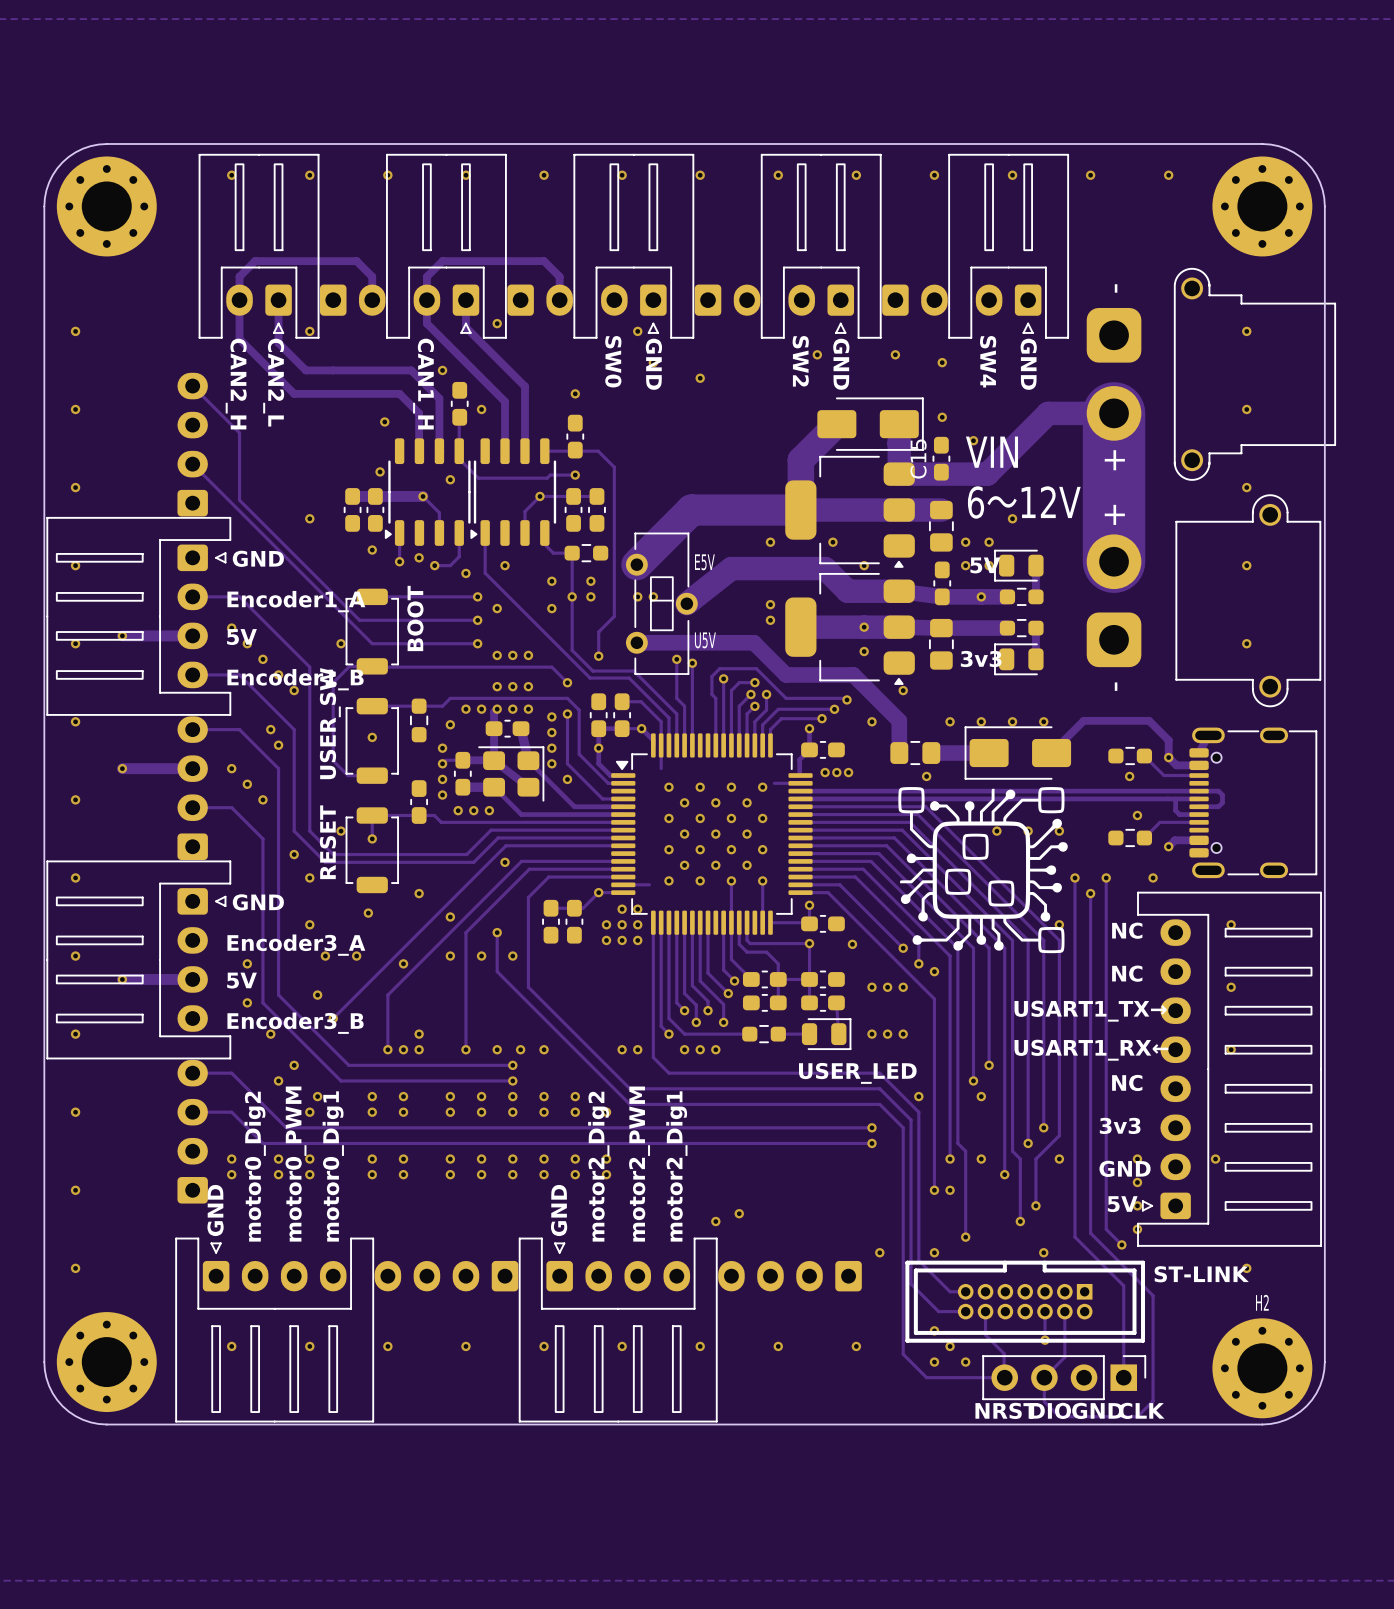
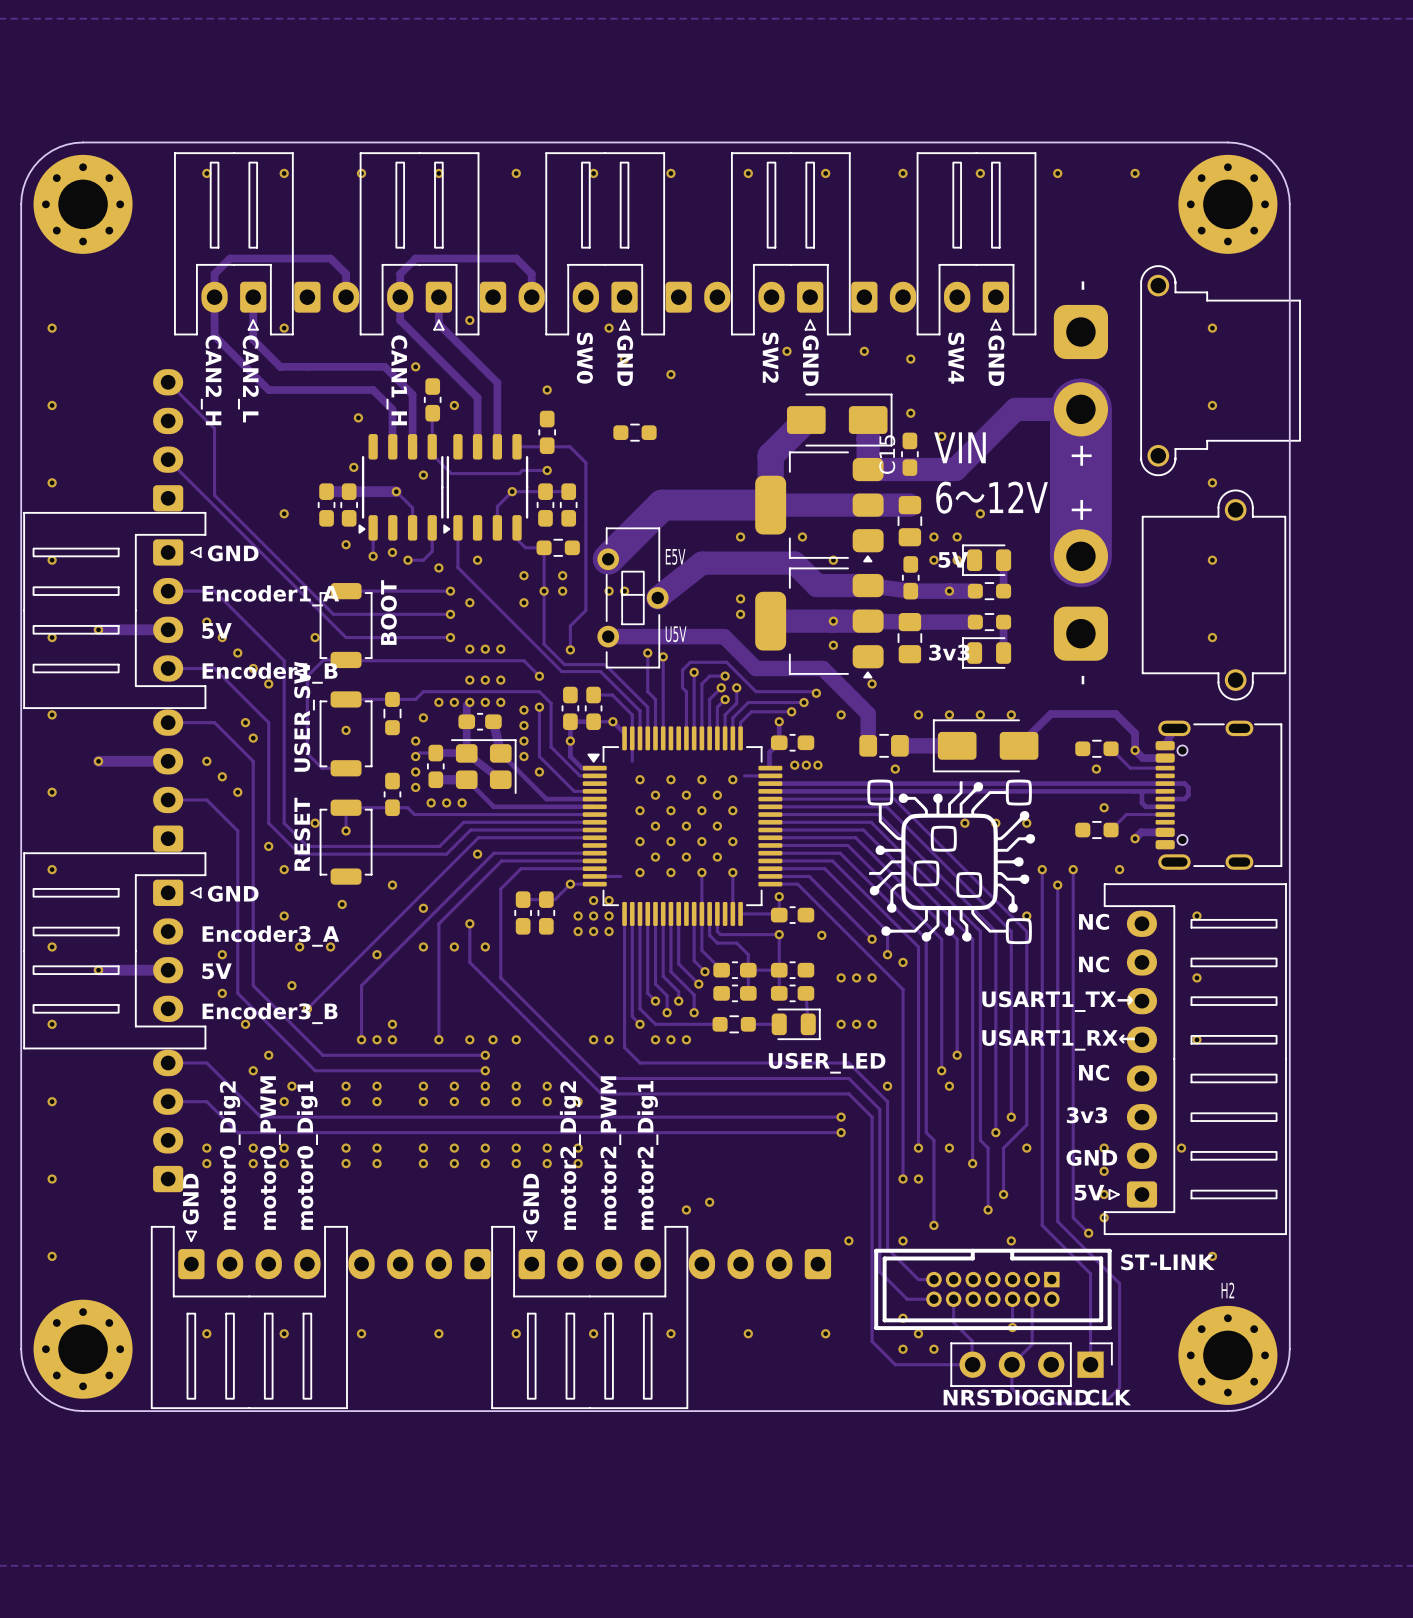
part: none -> (634, 432)

